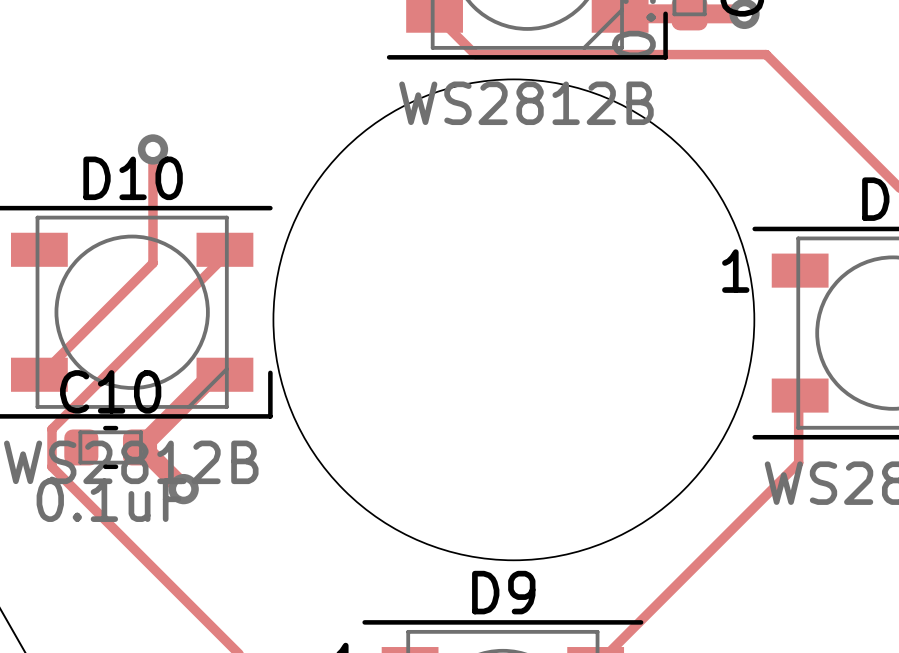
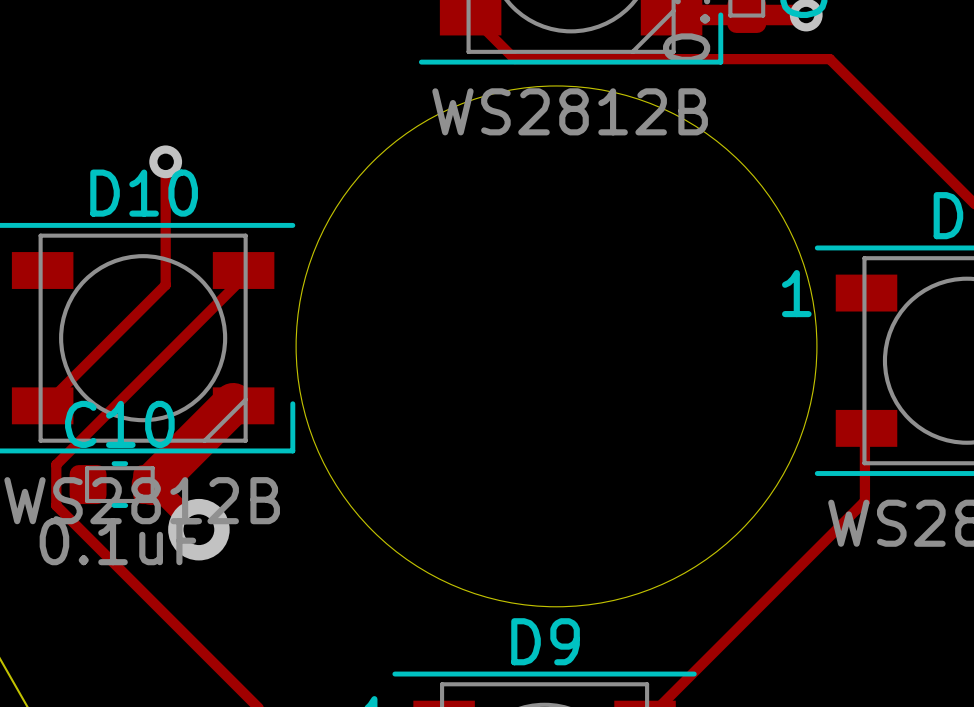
track width: thin (215, 372) (140, 447) -> thick (233, 403) (152, 484)
via size: [168, 473, 199, 505] -> [168, 498, 230, 561]

